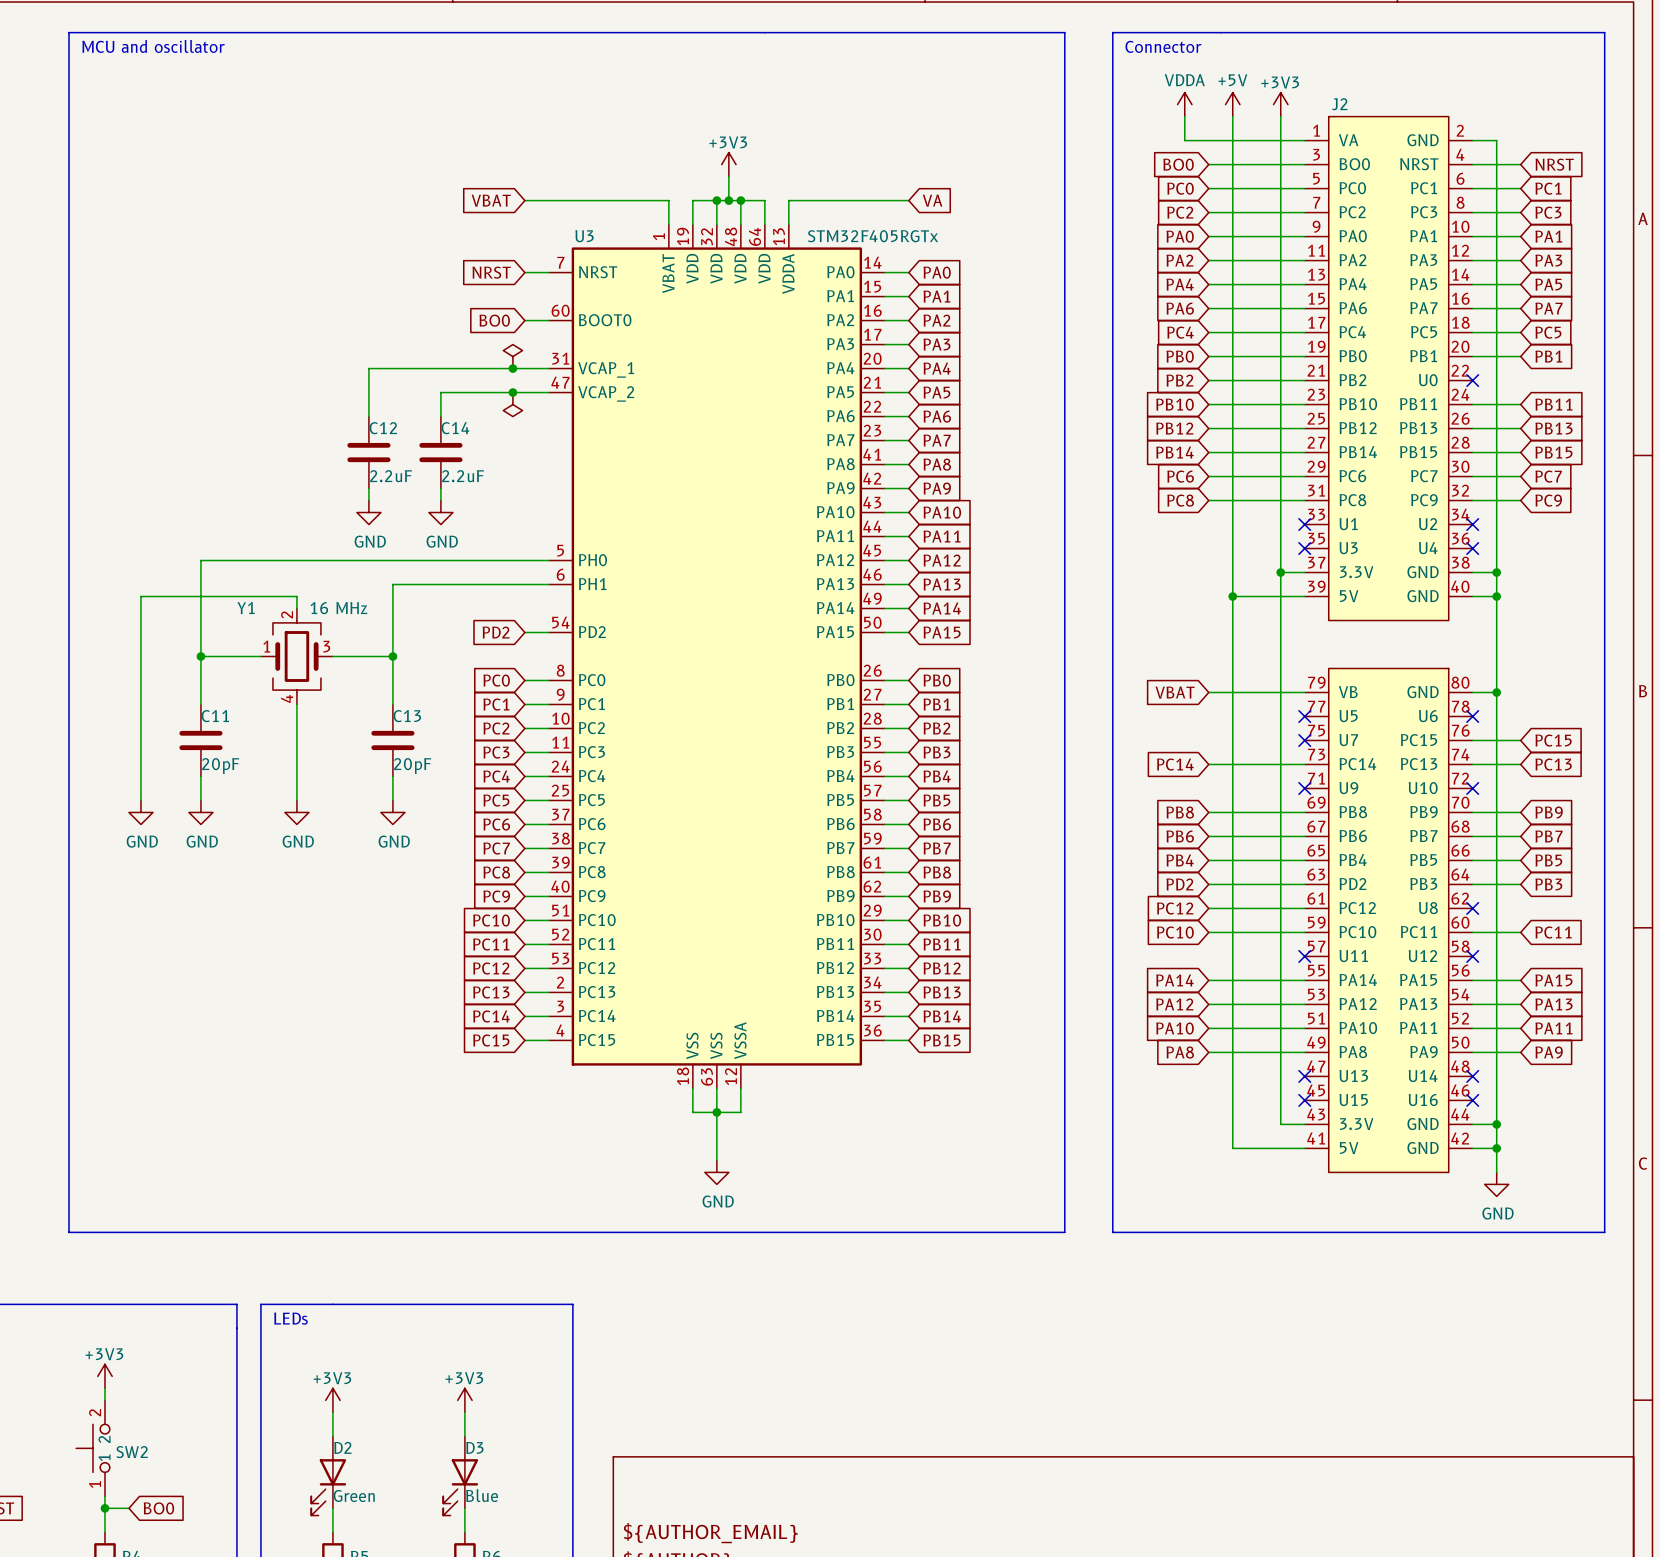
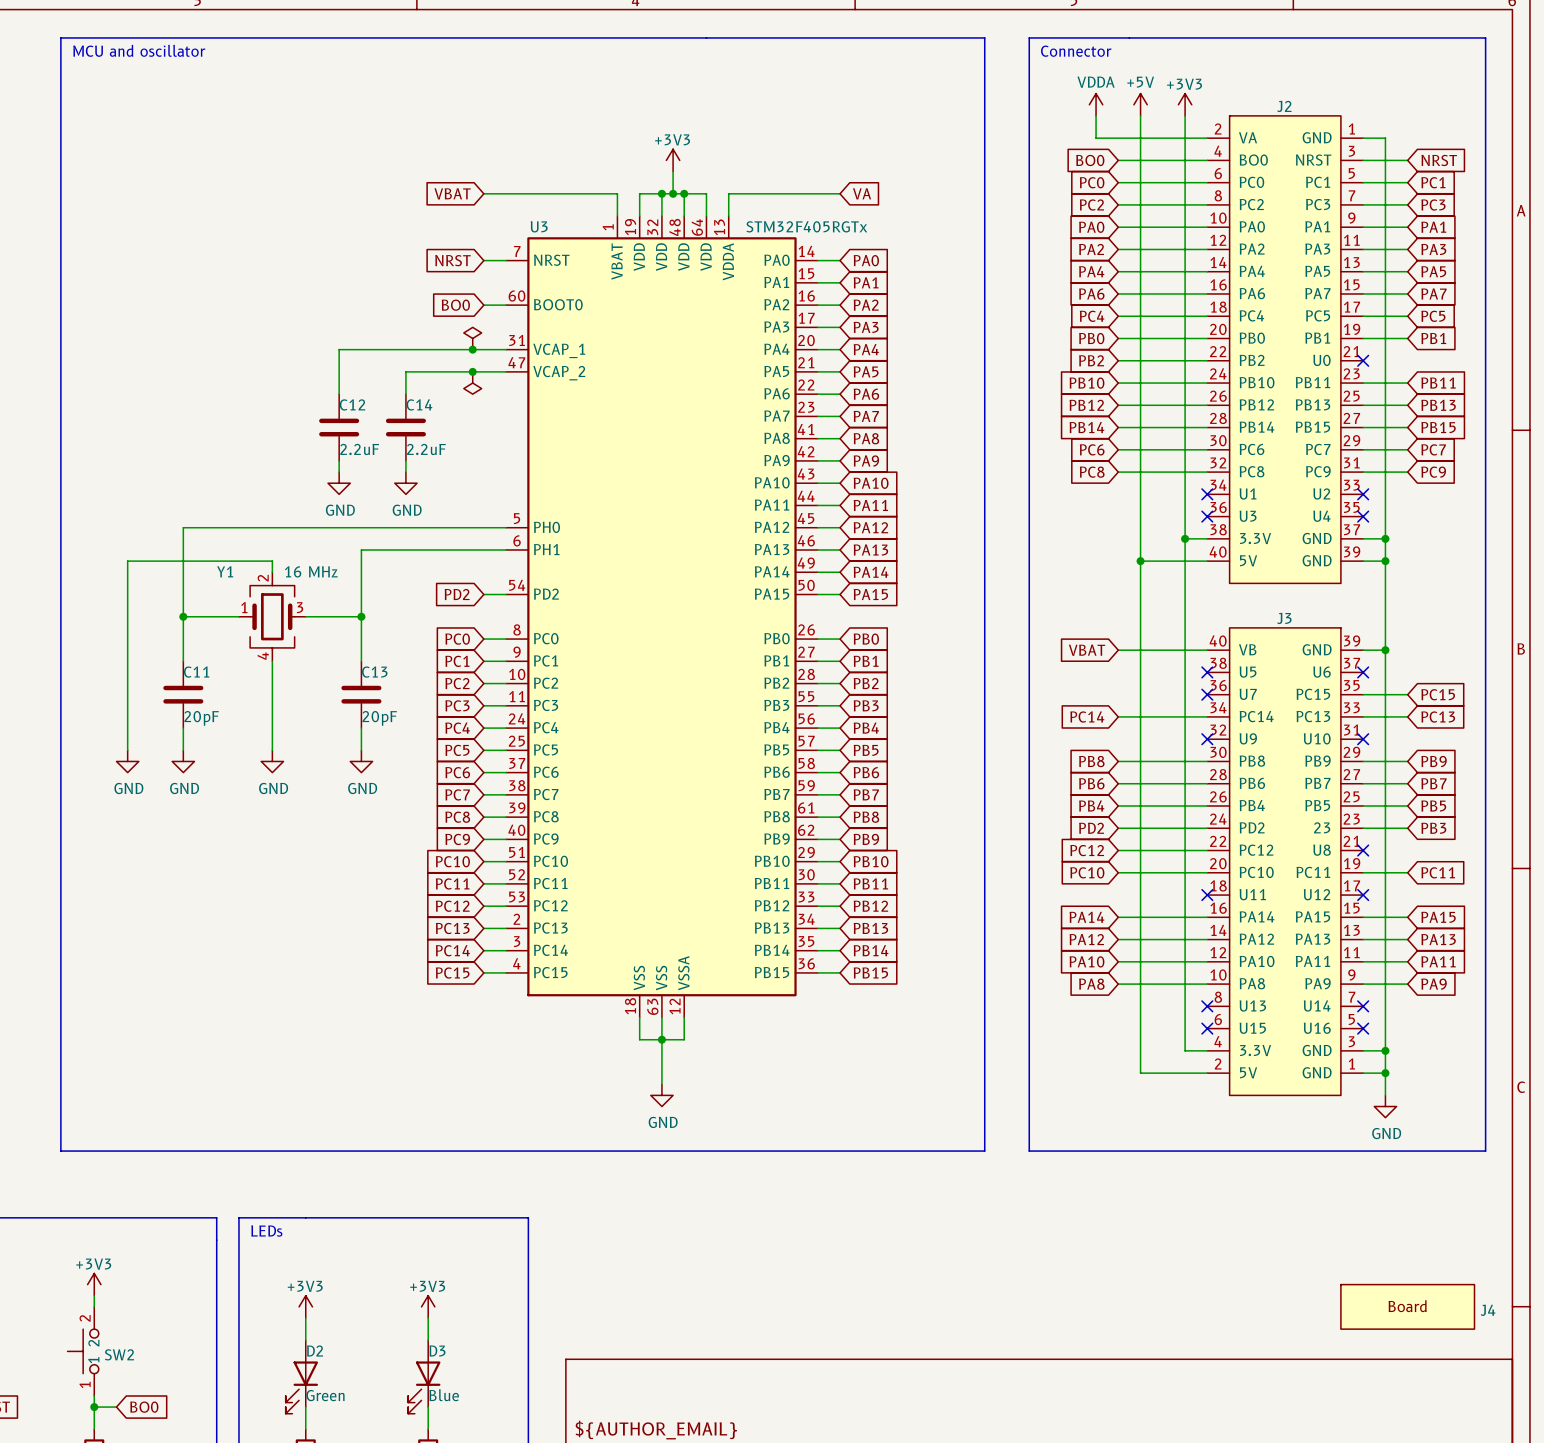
J2 name position: J2 (1339, 104) -> J2 (1284, 106)
J2 symbol: [1304, 116, 1473, 1173] -> [1207, 115, 1364, 584]
J3: none -> (1285, 861)
J4: none -> (1407, 1306)

